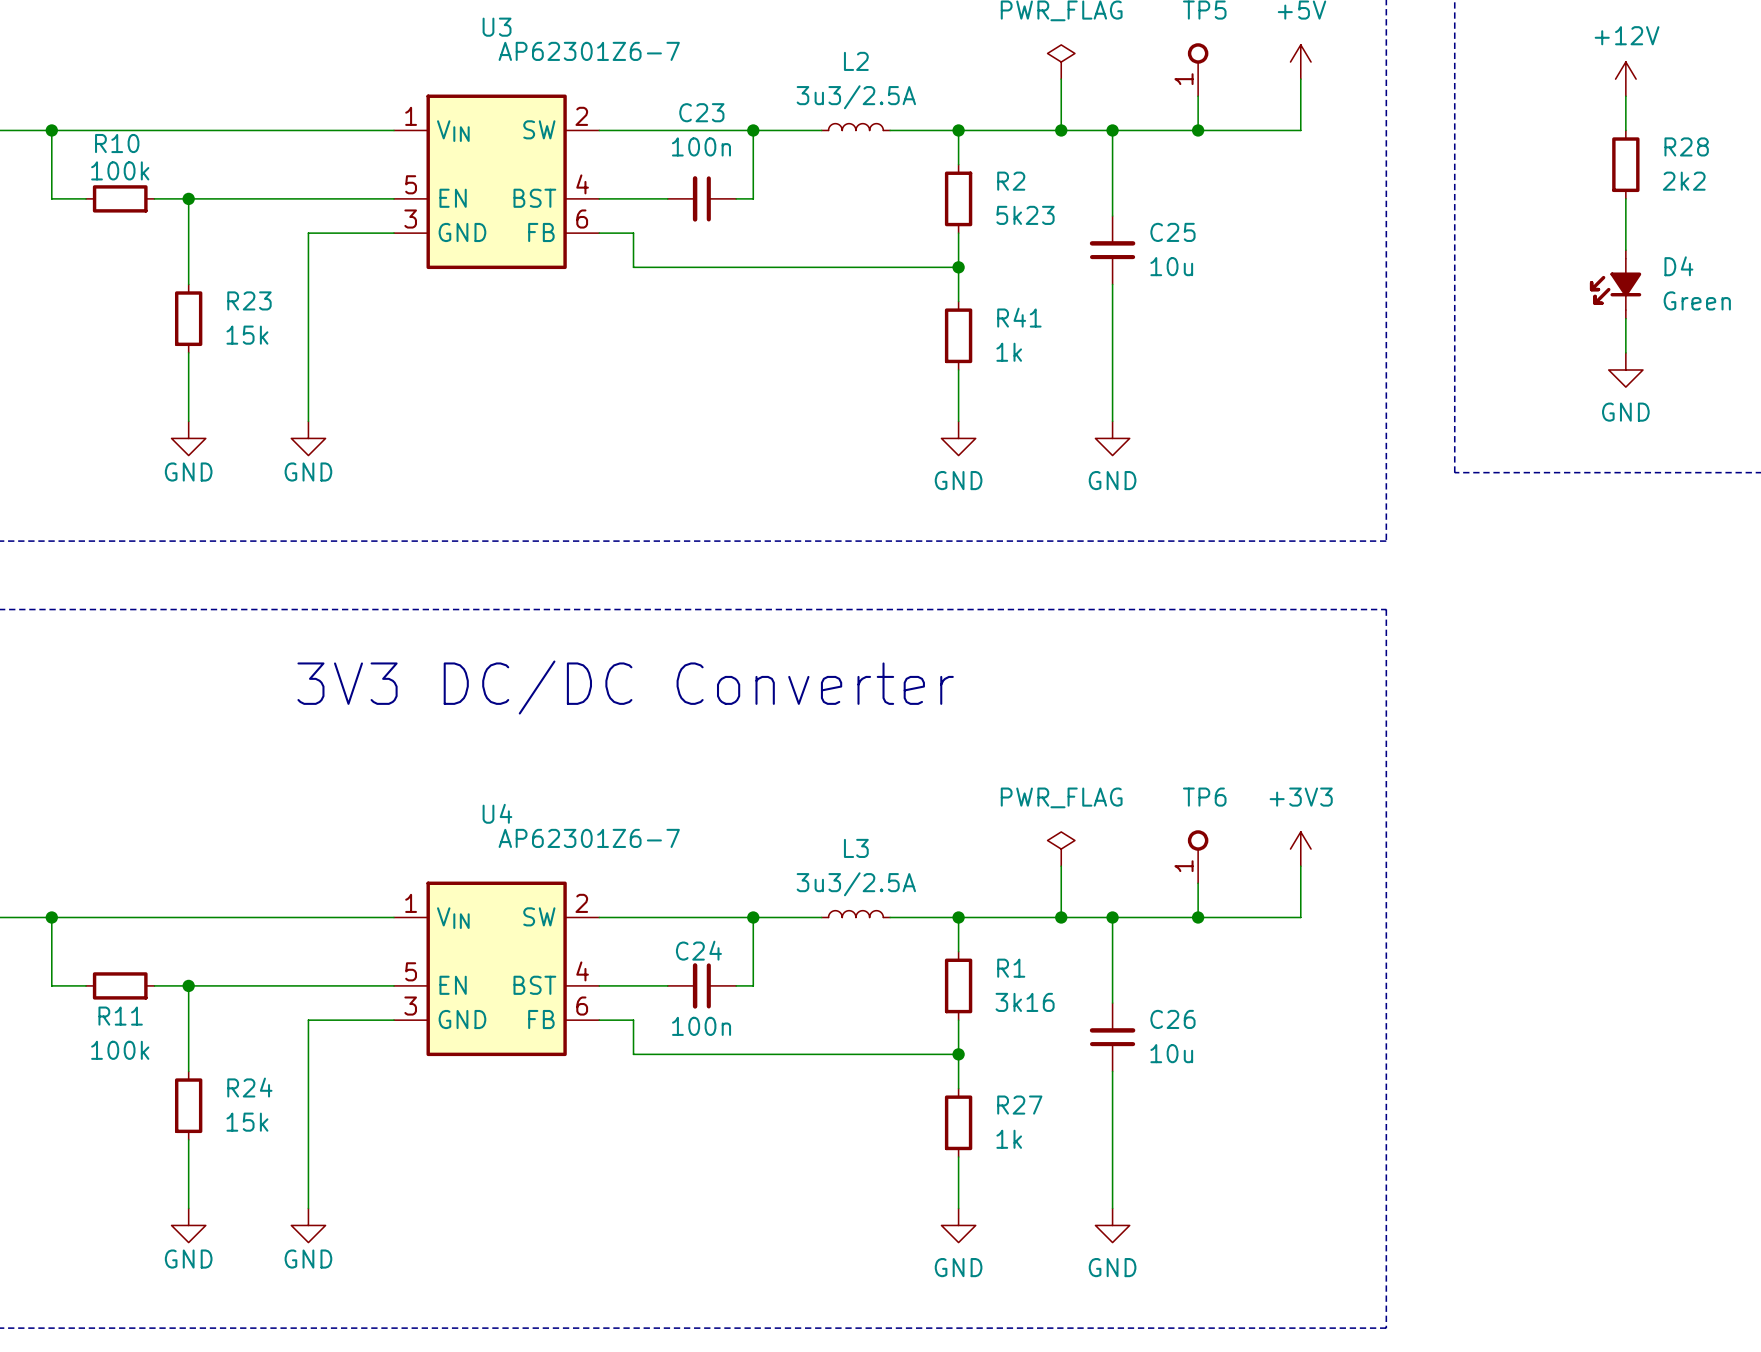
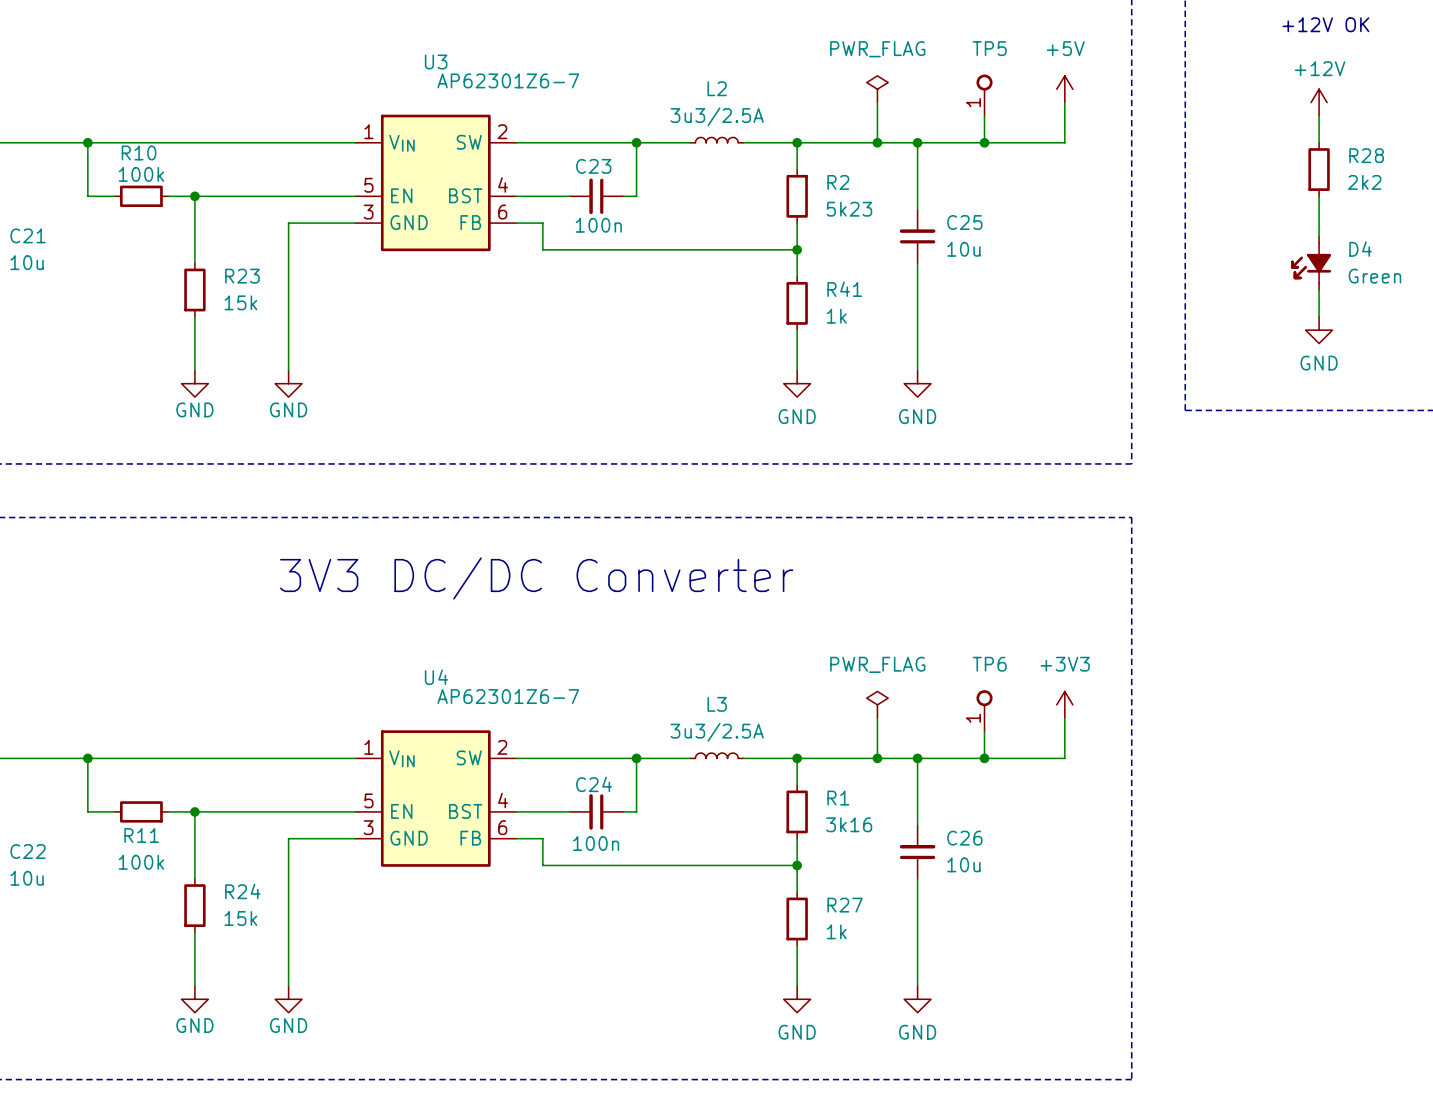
C23 name position: C23 (701, 112) -> C23 (593, 166)
C23 text position: 100n (701, 146) -> 100n (598, 225)

